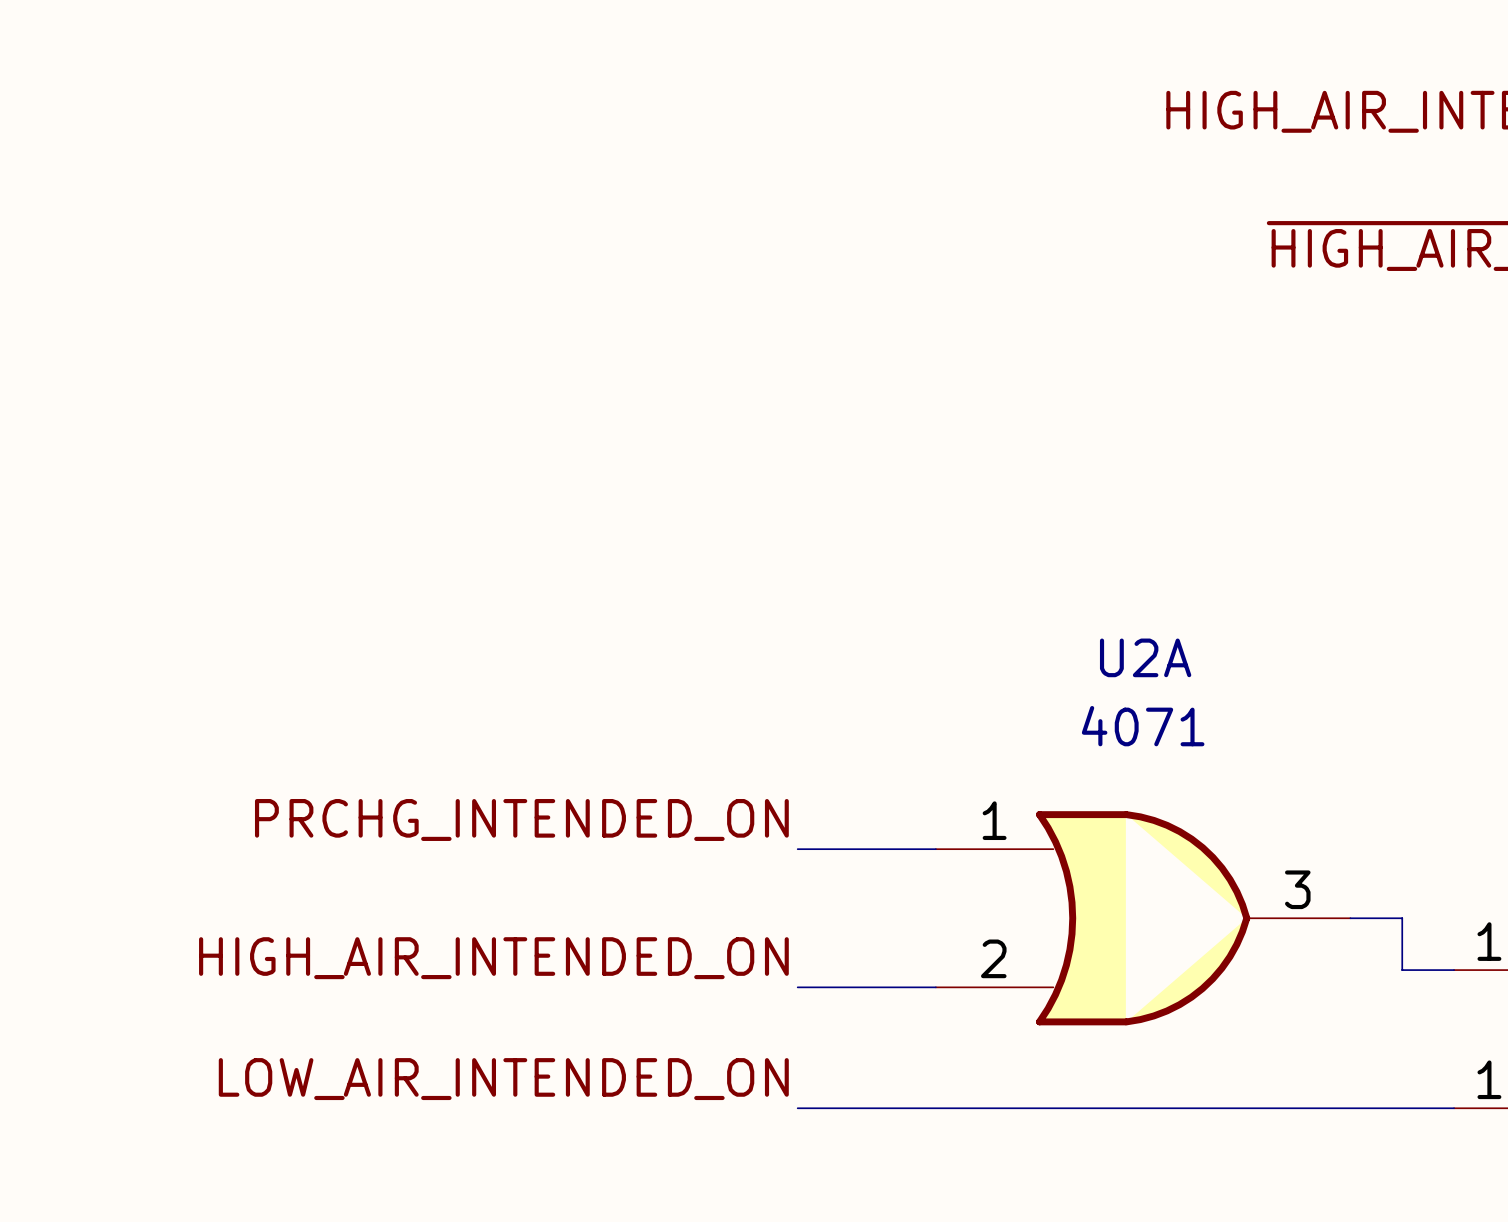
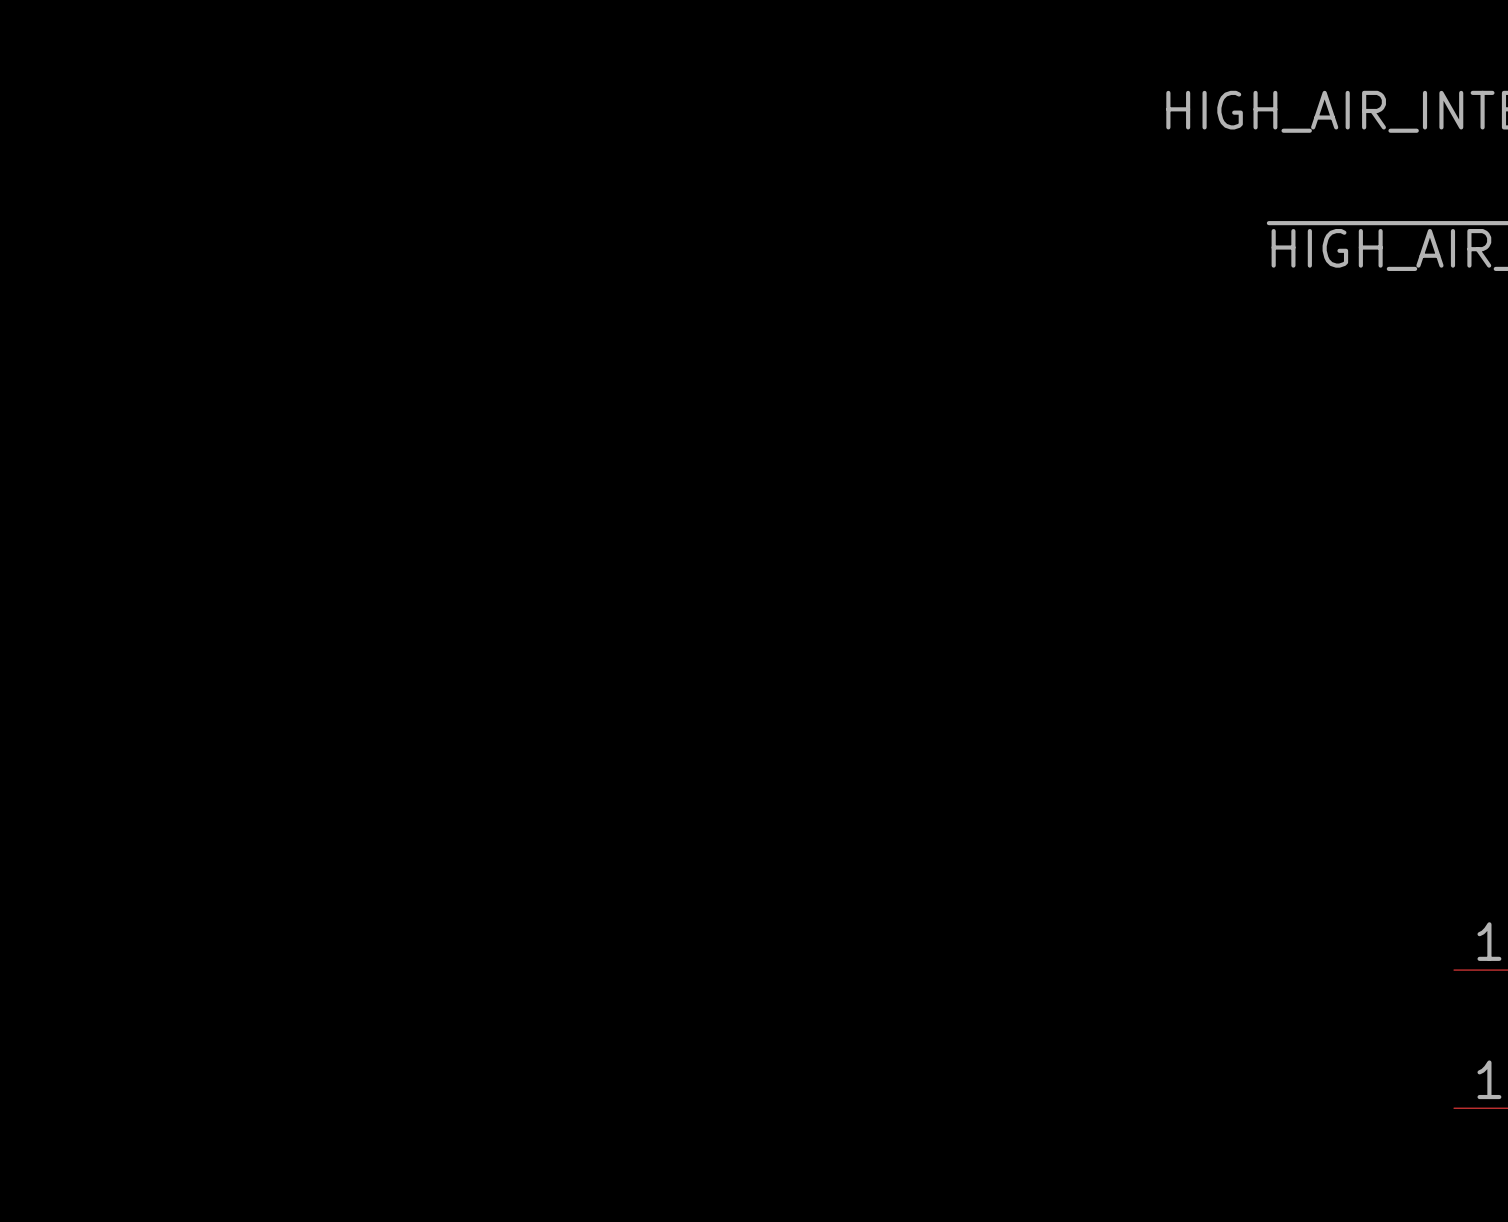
label: PRCHG_INTENDED_ON (521, 819) -> none
wire: (797, 849) (935, 849) -> none
U2A: 4071 (1143, 918) -> none
wire: (1350, 918) (1402, 918) (1402, 970) (1454, 970) -> none
label: HIGH_AIR_INTENDED_ON (493, 958) -> none
wire: (797, 987) (935, 987) -> none
label: LOW_AIR_INTENDED_ON (503, 1079) -> none
wire: (797, 1108) (1454, 1108) -> none

